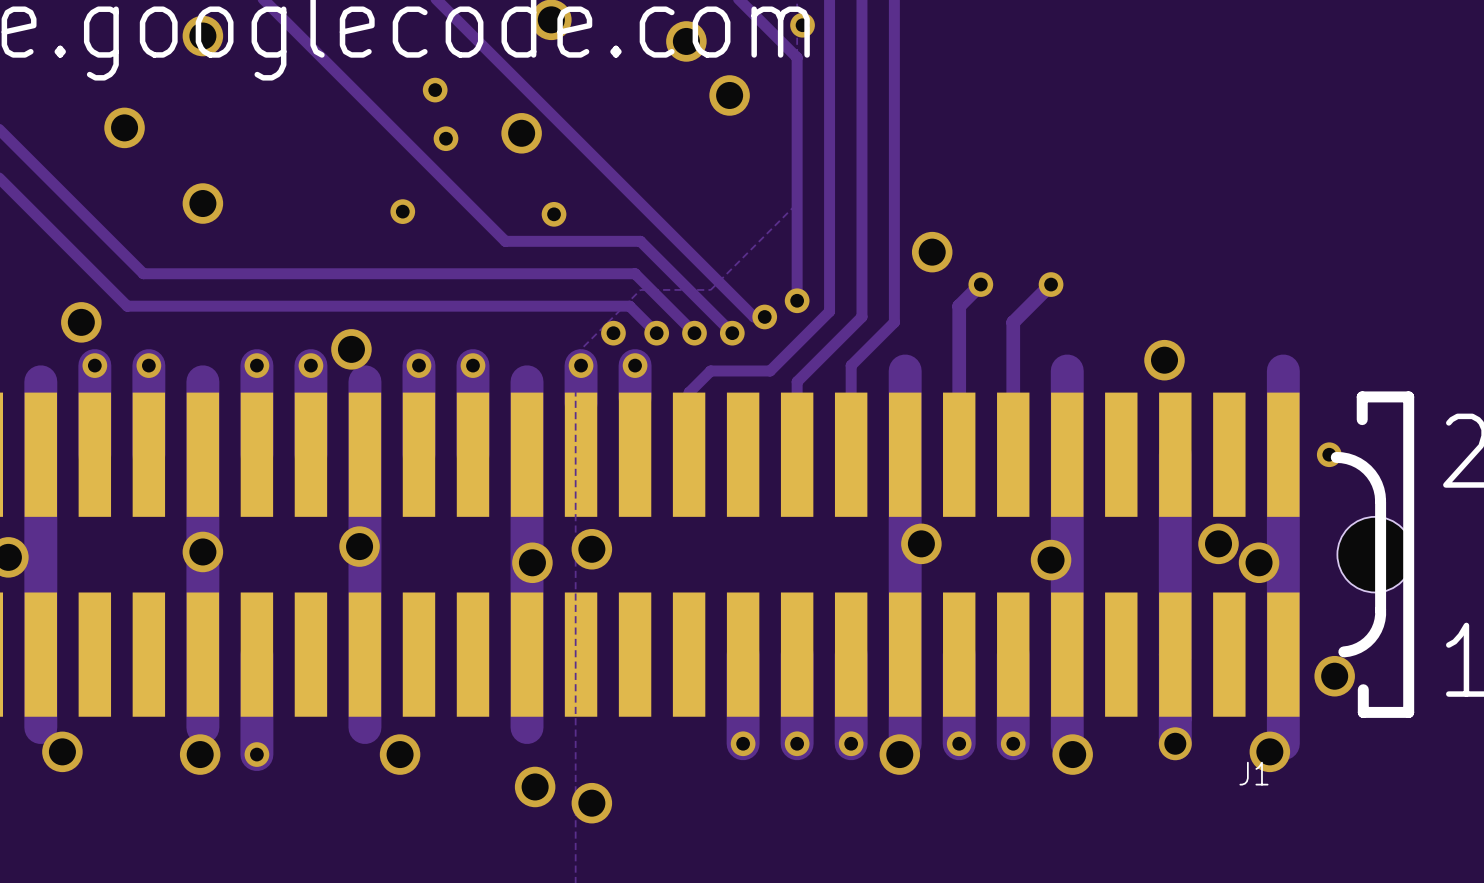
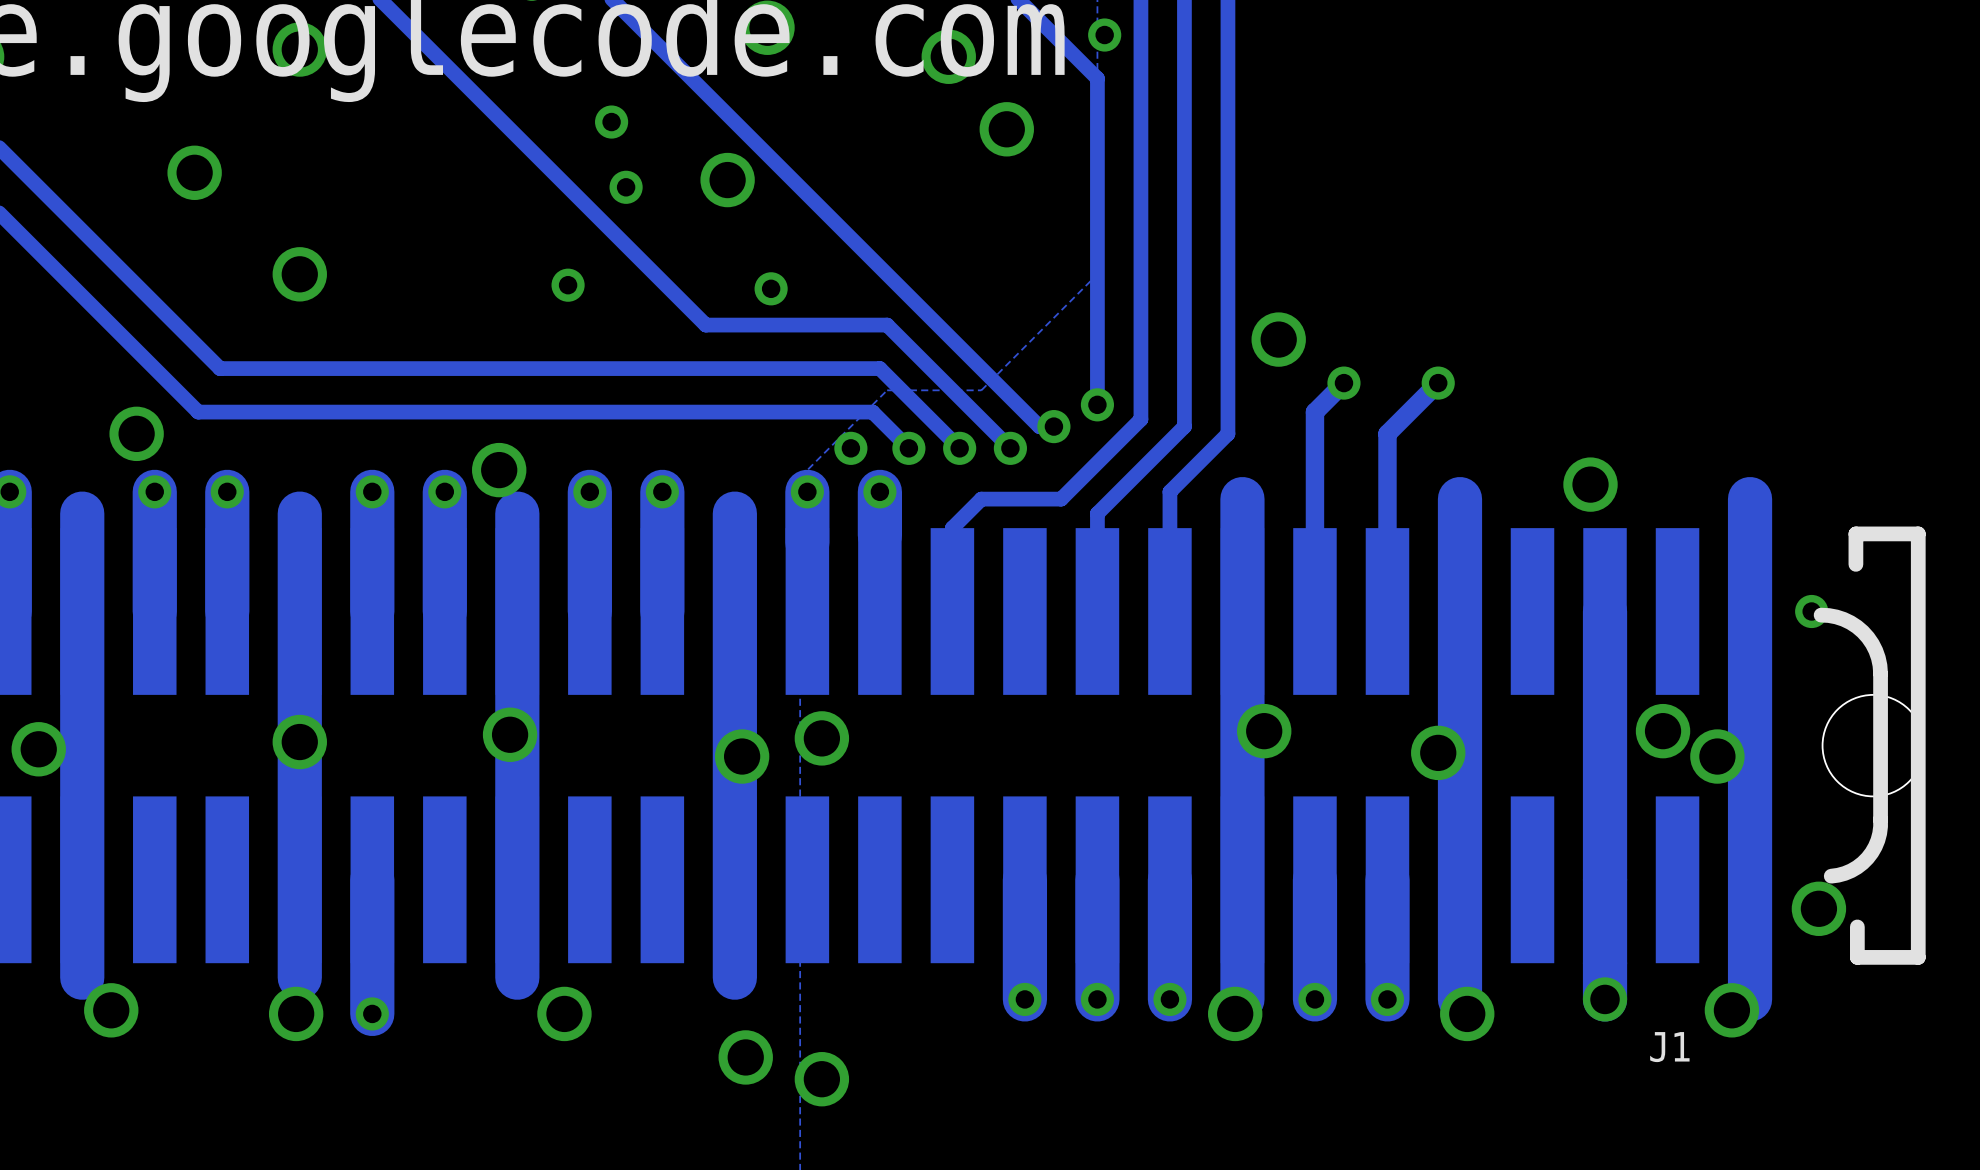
J1 name position: J1 (1253, 773) -> J1 (1669, 1047)

